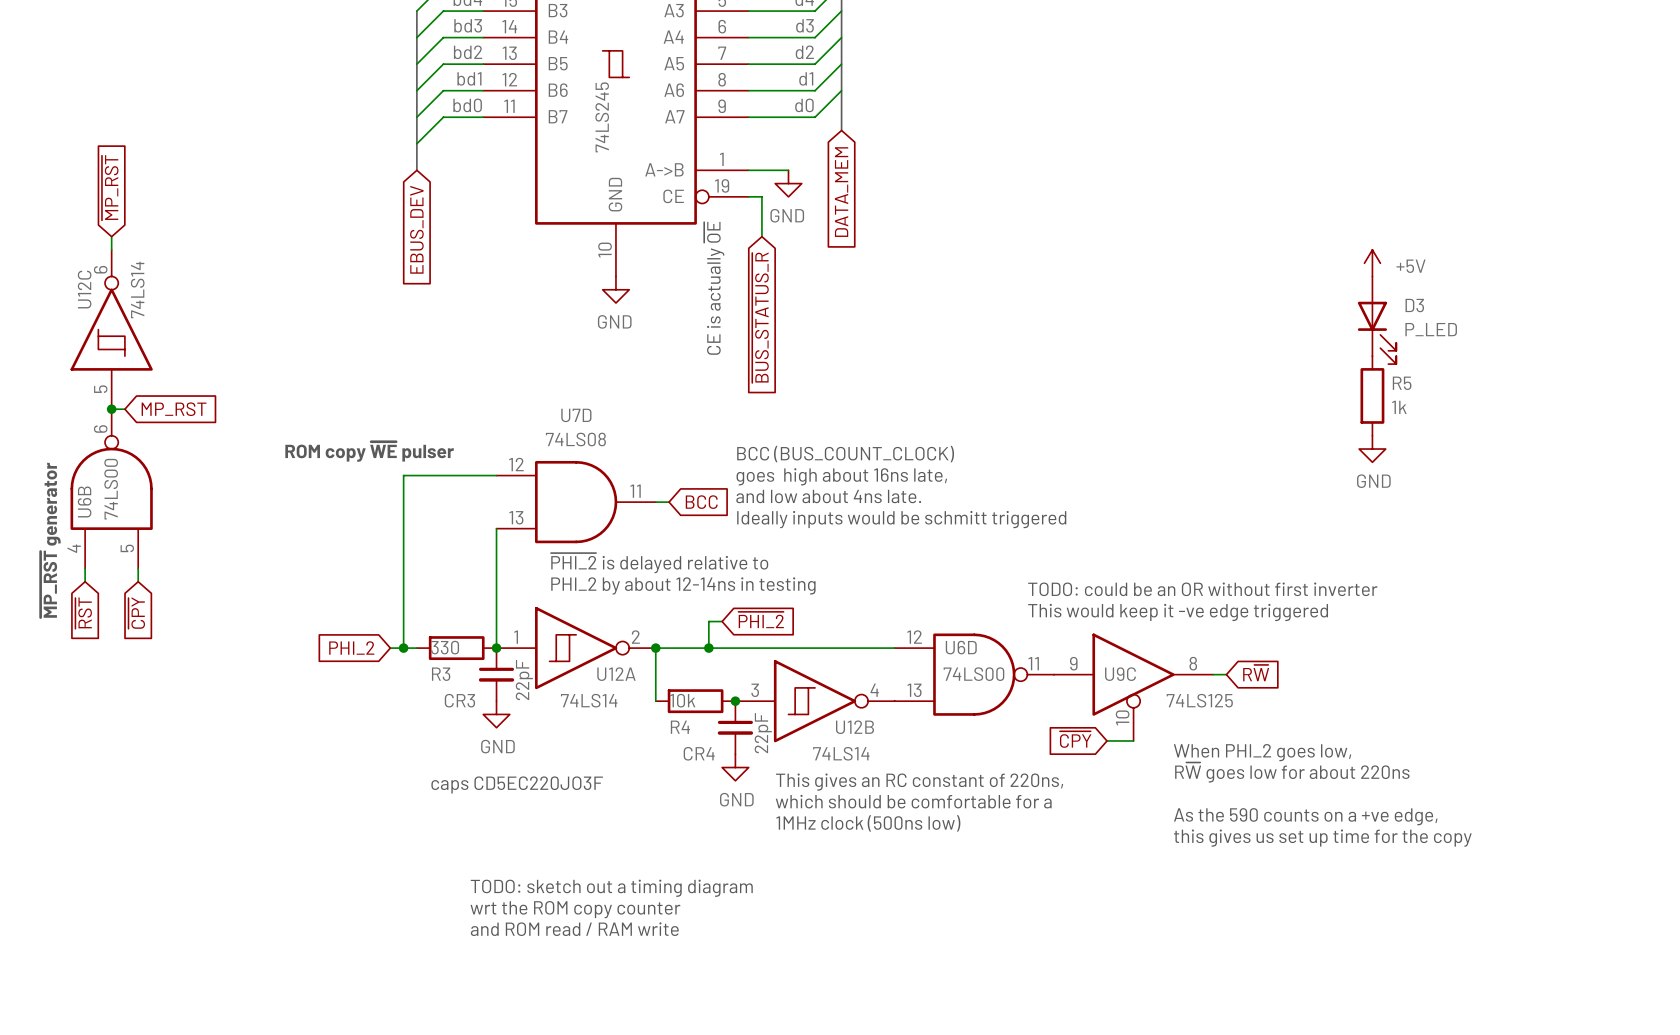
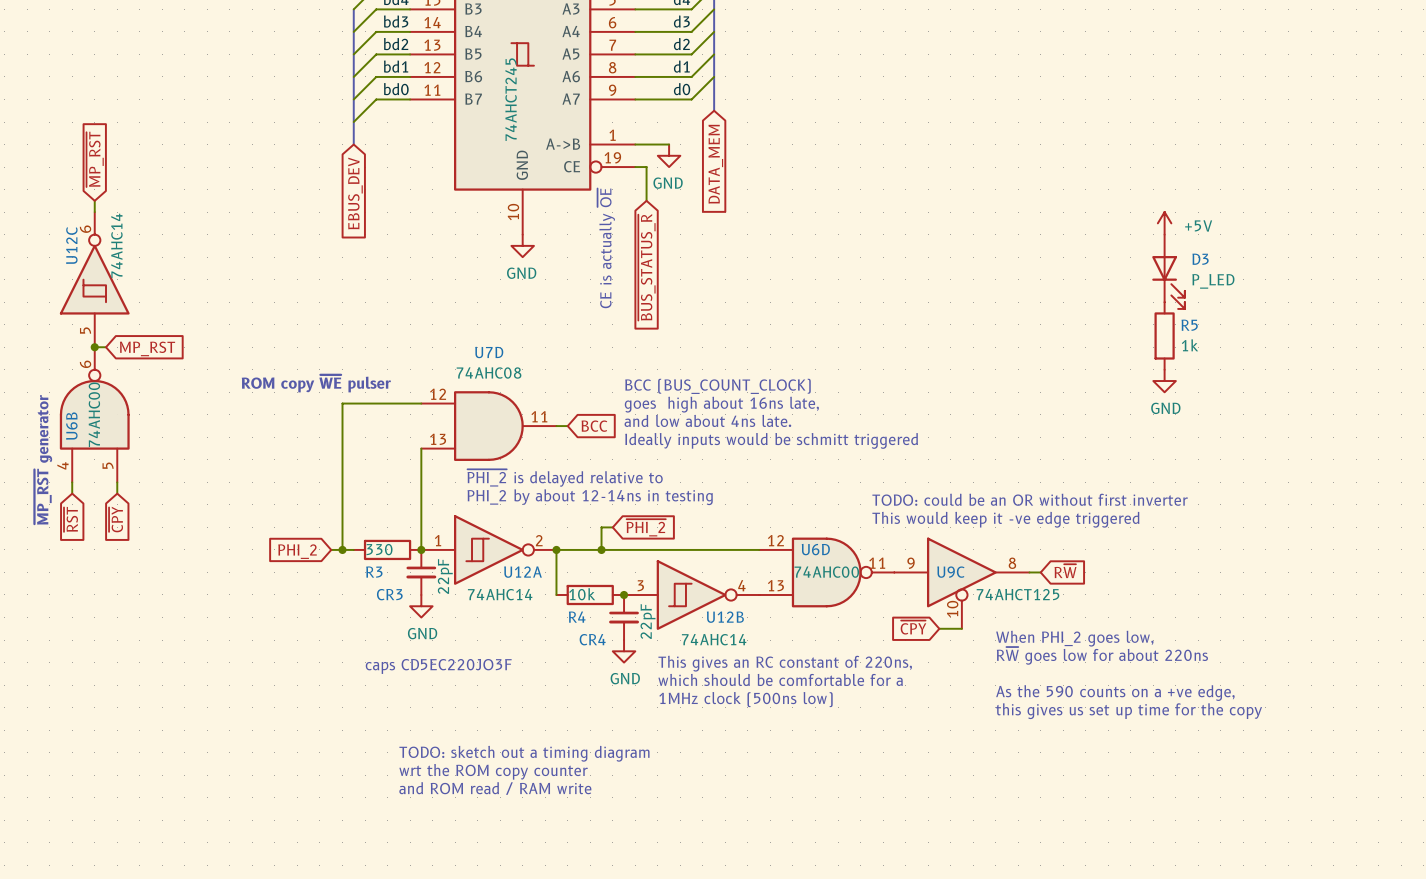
part value: 74LS245 (602, 117) -> 74AHCT245 (511, 99)
U12C value: 74LS14 (137, 290) -> 74AHC14 (116, 245)
U7D value: 74LS08 (575, 439) -> 74AHC08 (489, 373)
U6B value: 74LS00 (111, 489) -> 74AHC00 (94, 414)
U6D value: 74LS00 (973, 674) -> 74AHC00 (826, 572)
U12A value: 74LS14 (589, 700) -> 74AHC14 (500, 594)
U9C value: 74LS125 (1199, 700) -> 74AHCT125 (1018, 594)
U12B value: 74LS14 (841, 753) -> 74AHC14 (714, 639)

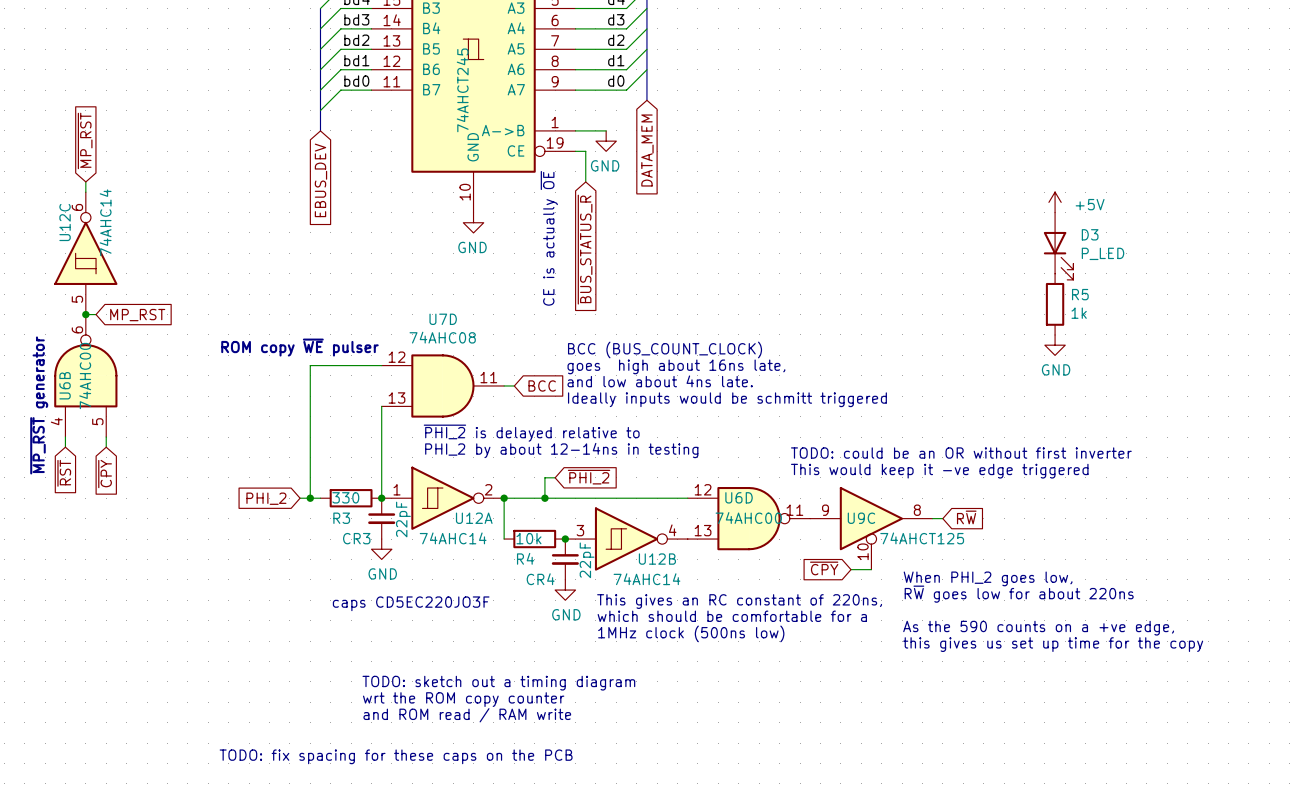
text: none -> TODO: fix spacing for these caps on the PCB (396, 756)

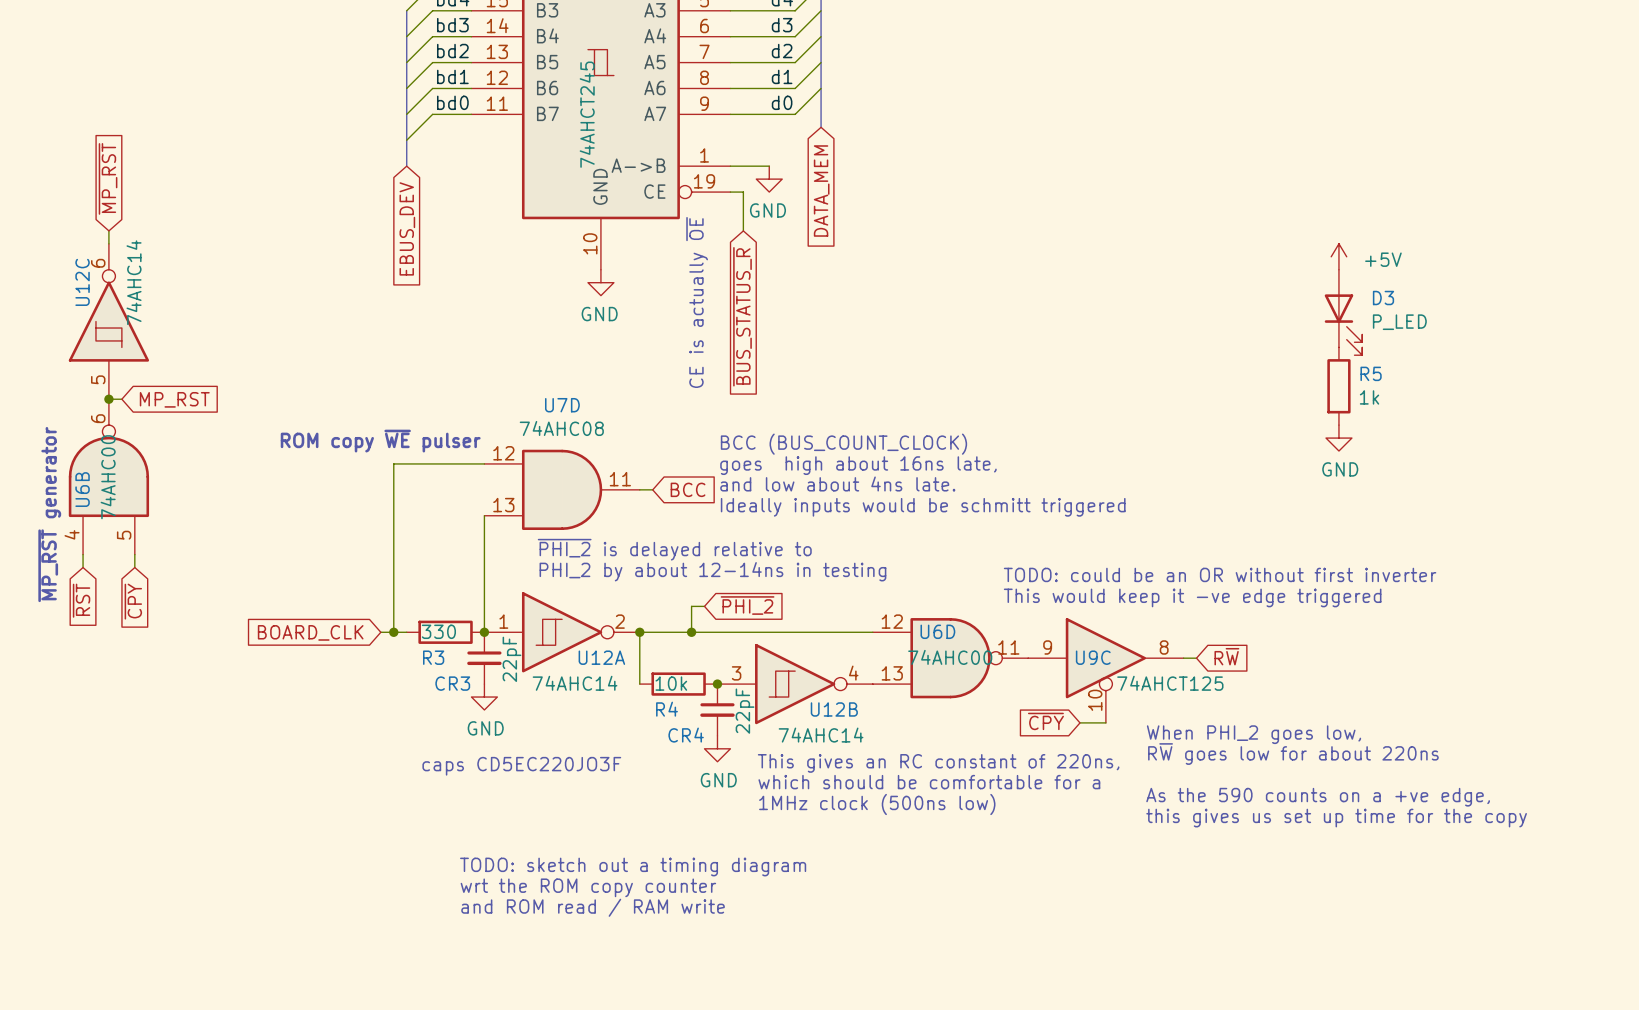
global label: PHI_2 (266, 498) -> BOARD_CLK (310, 632)
text: TODO: fix spacing for these caps on the PCB (396, 756) -> none

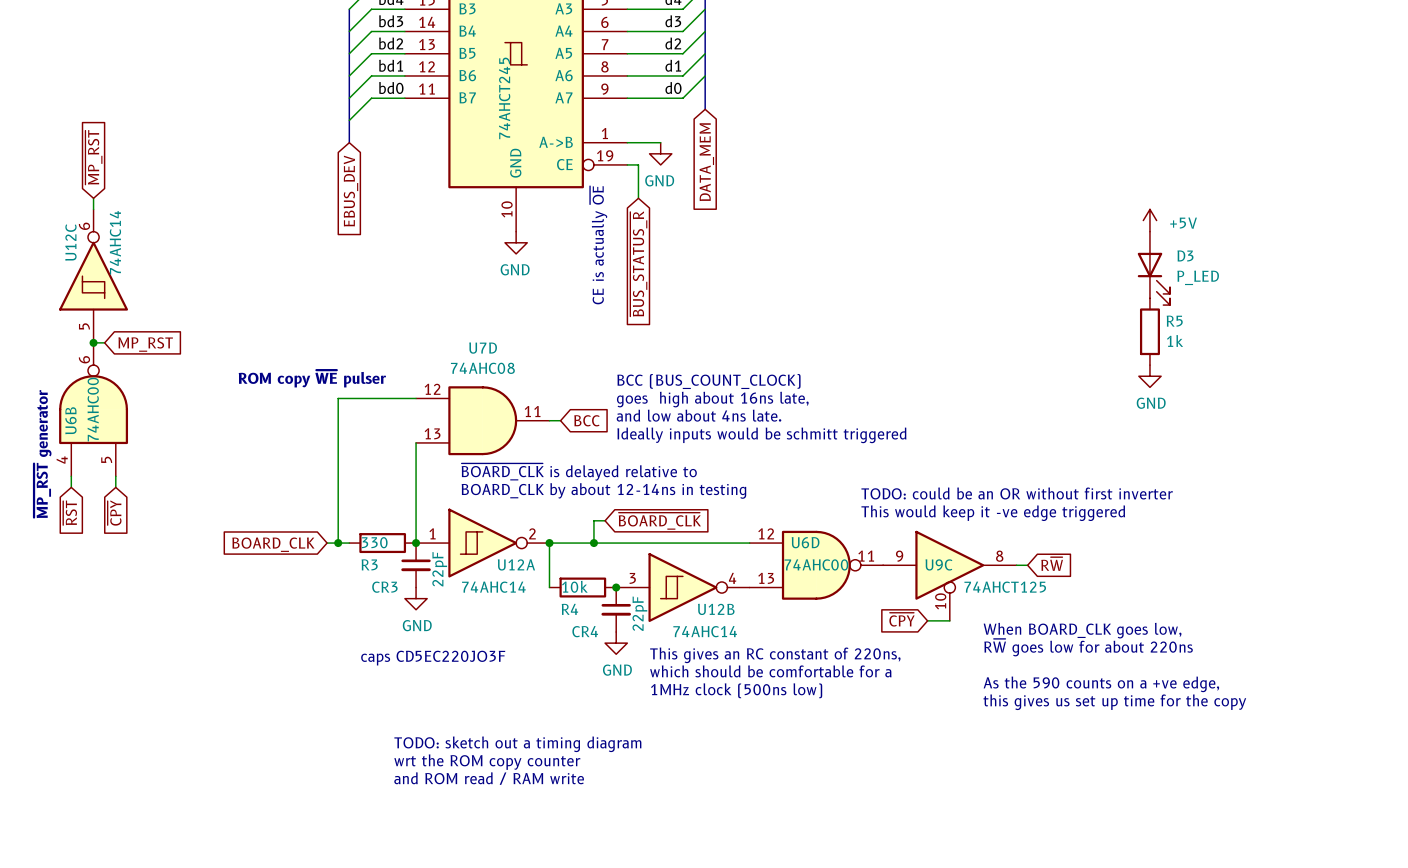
text: ~{PHI_2} is delayed relative to (674, 549) -> ~{BOARD_CLK} is delayed relative to (579, 472)
text: PHI_2 by about 12-14ns in testing (712, 571) -> BOARD_CLK by about 12-14ns in testing (603, 490)
global label: ~{PHI_2} (747, 605) -> ~{BOARD_CLK} (659, 521)
text: When PHI_2 goes low, (1253, 734) -> When BOARD_CLK goes low, (1082, 630)

